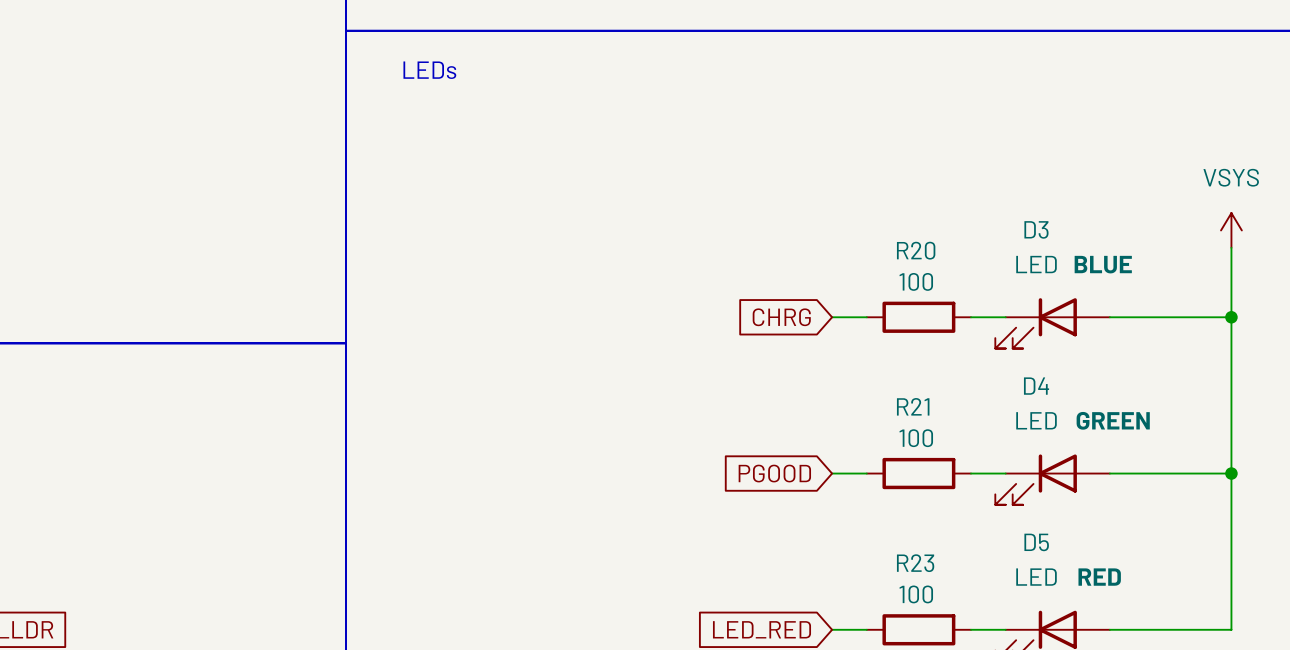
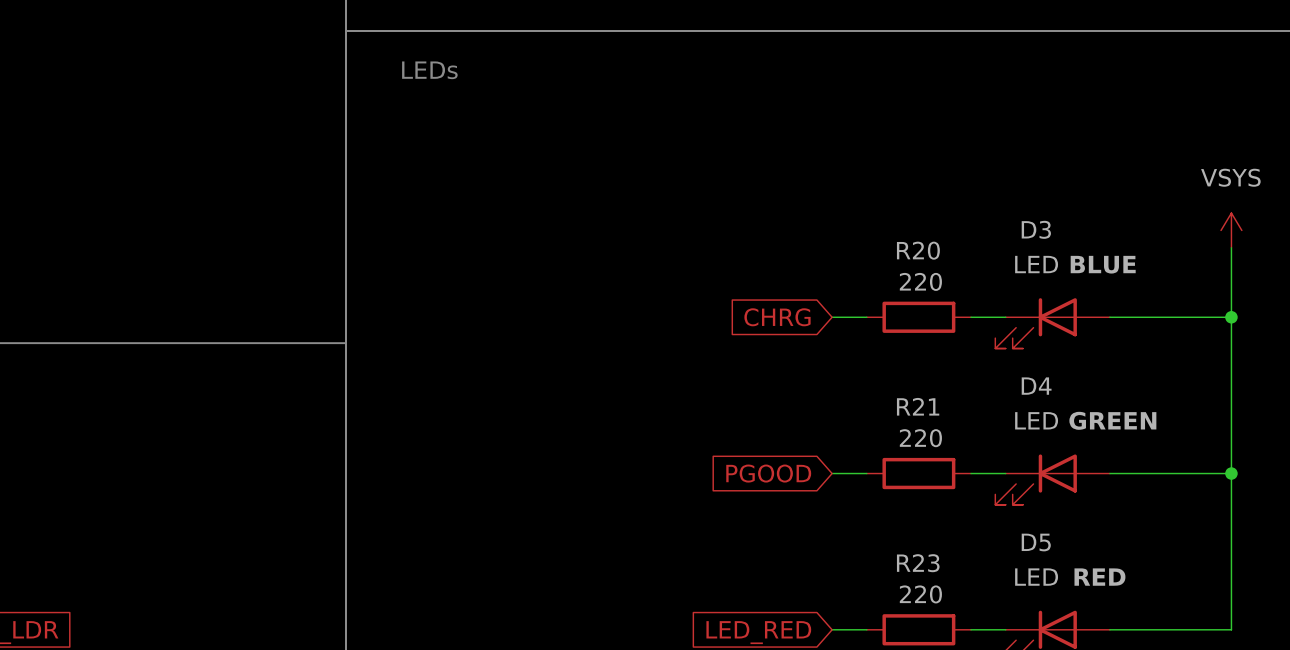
R20 value: 100 (916, 281) -> 220 (920, 281)
R21 value: 100 (916, 438) -> 220 (920, 438)
R23 value: 100 (916, 594) -> 220 (920, 594)

